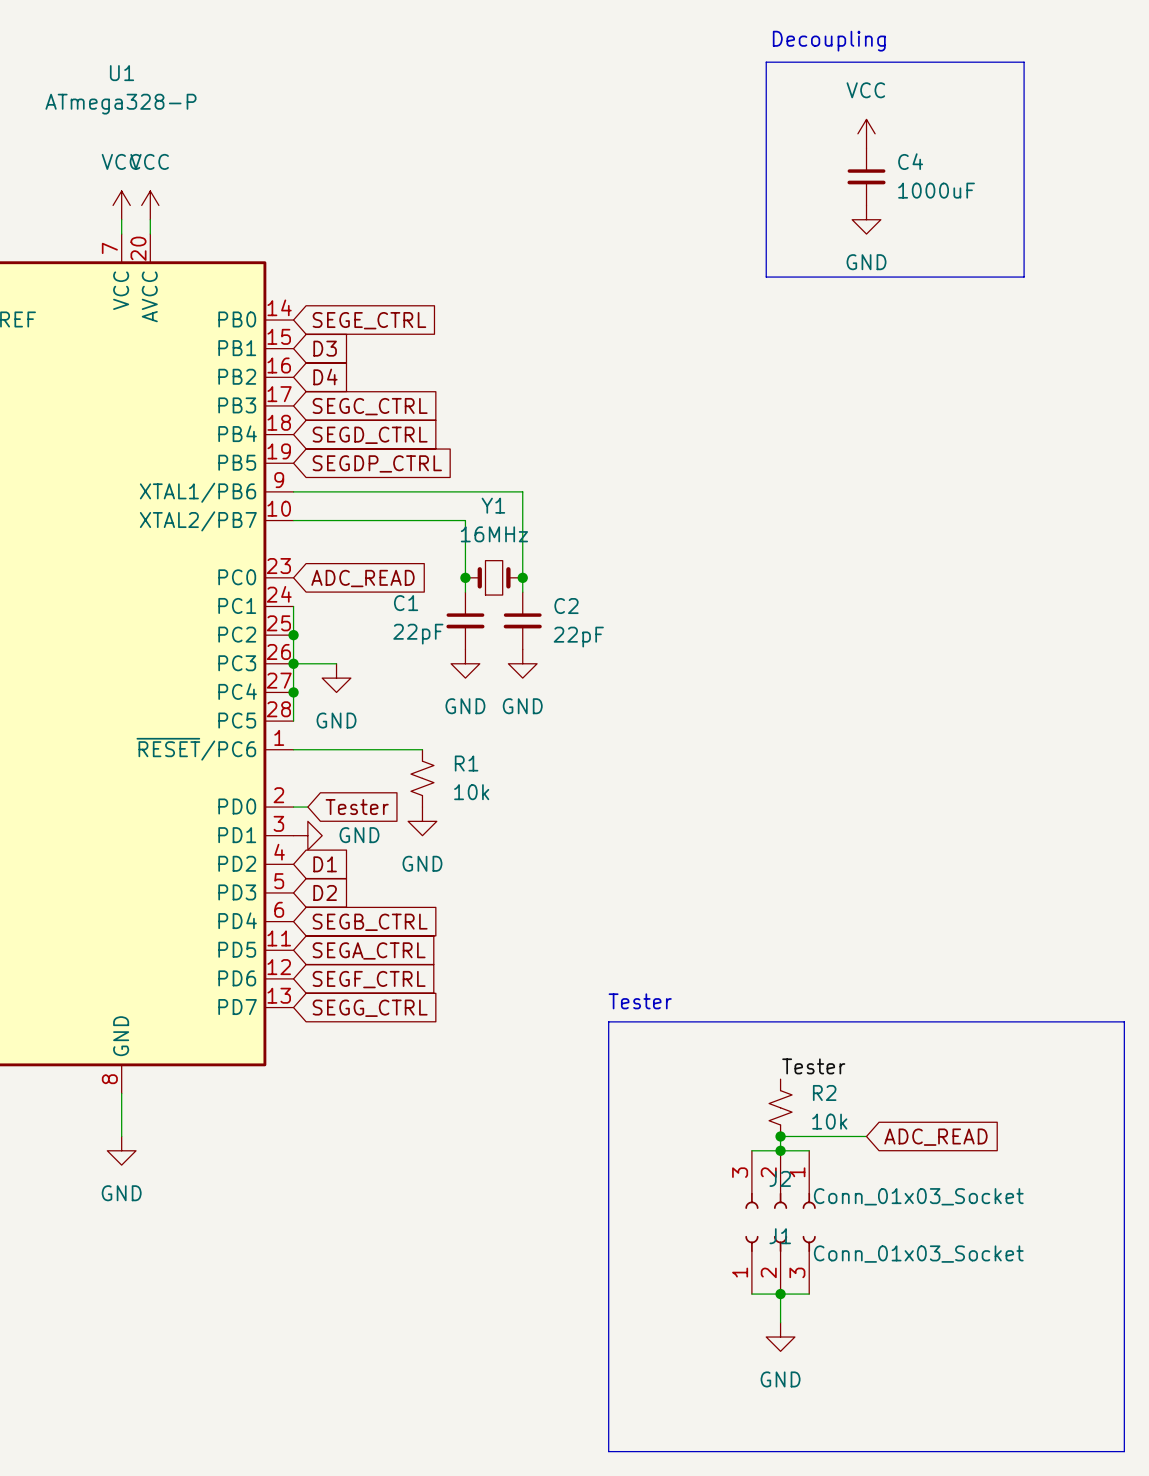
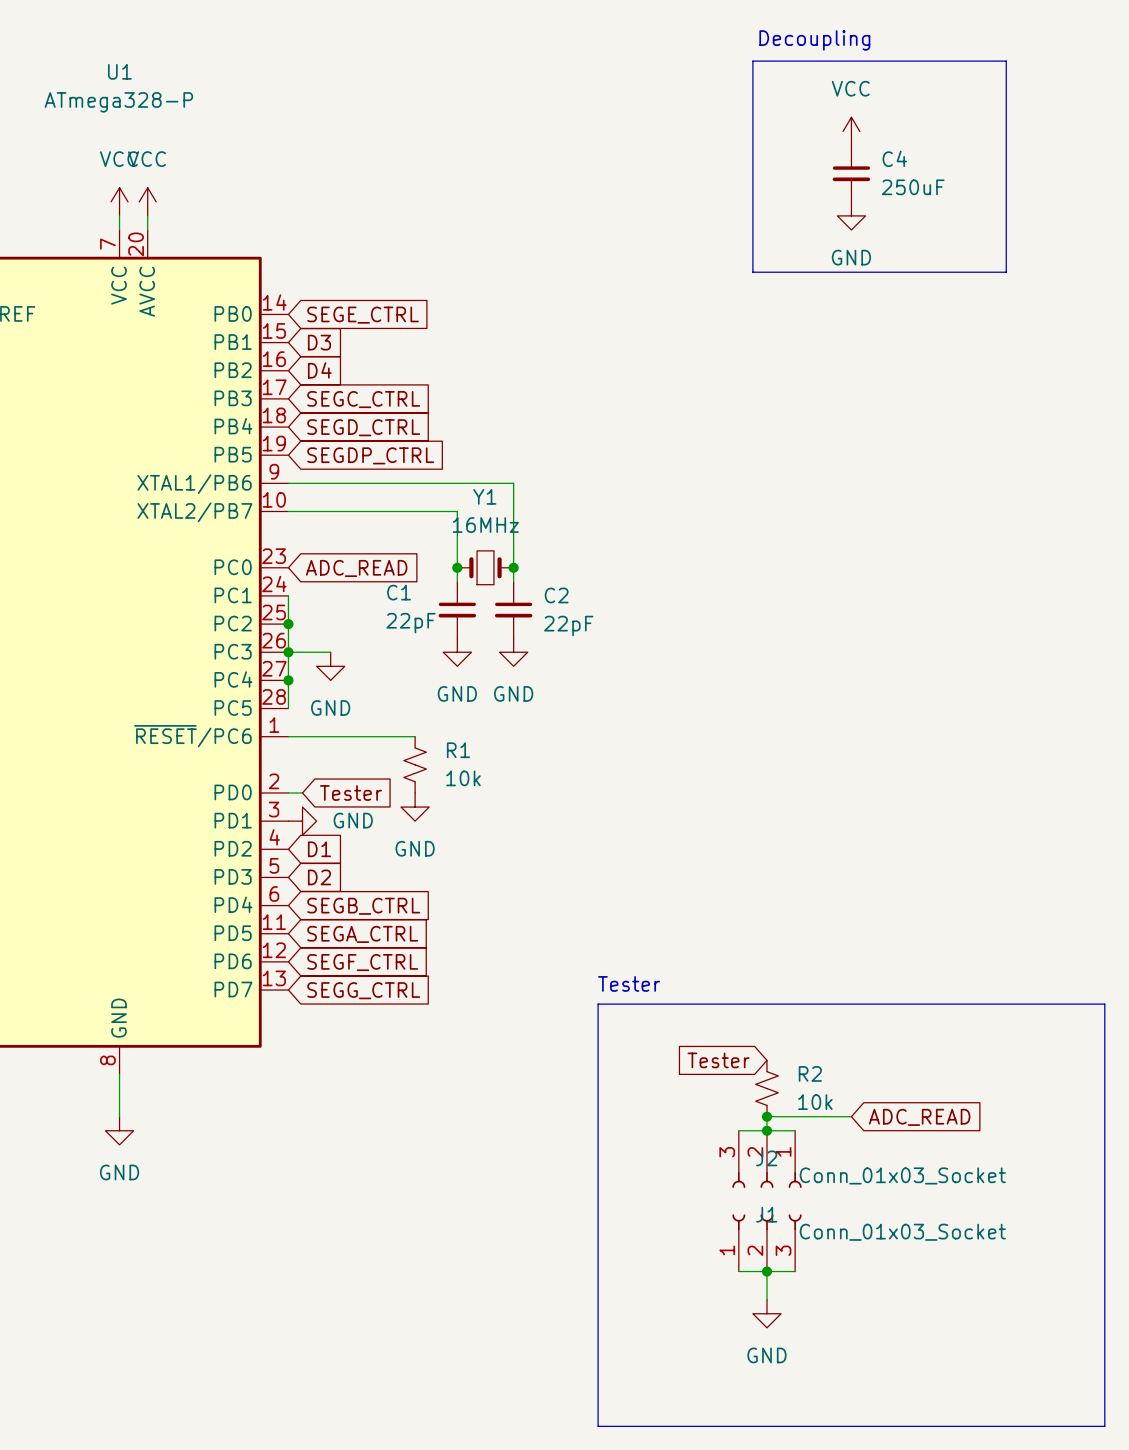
C4 value: 1000uF (936, 190) -> 250uF (913, 187)
label: Tester (813, 1066) -> none
global label: none -> Tester (718, 1060)

